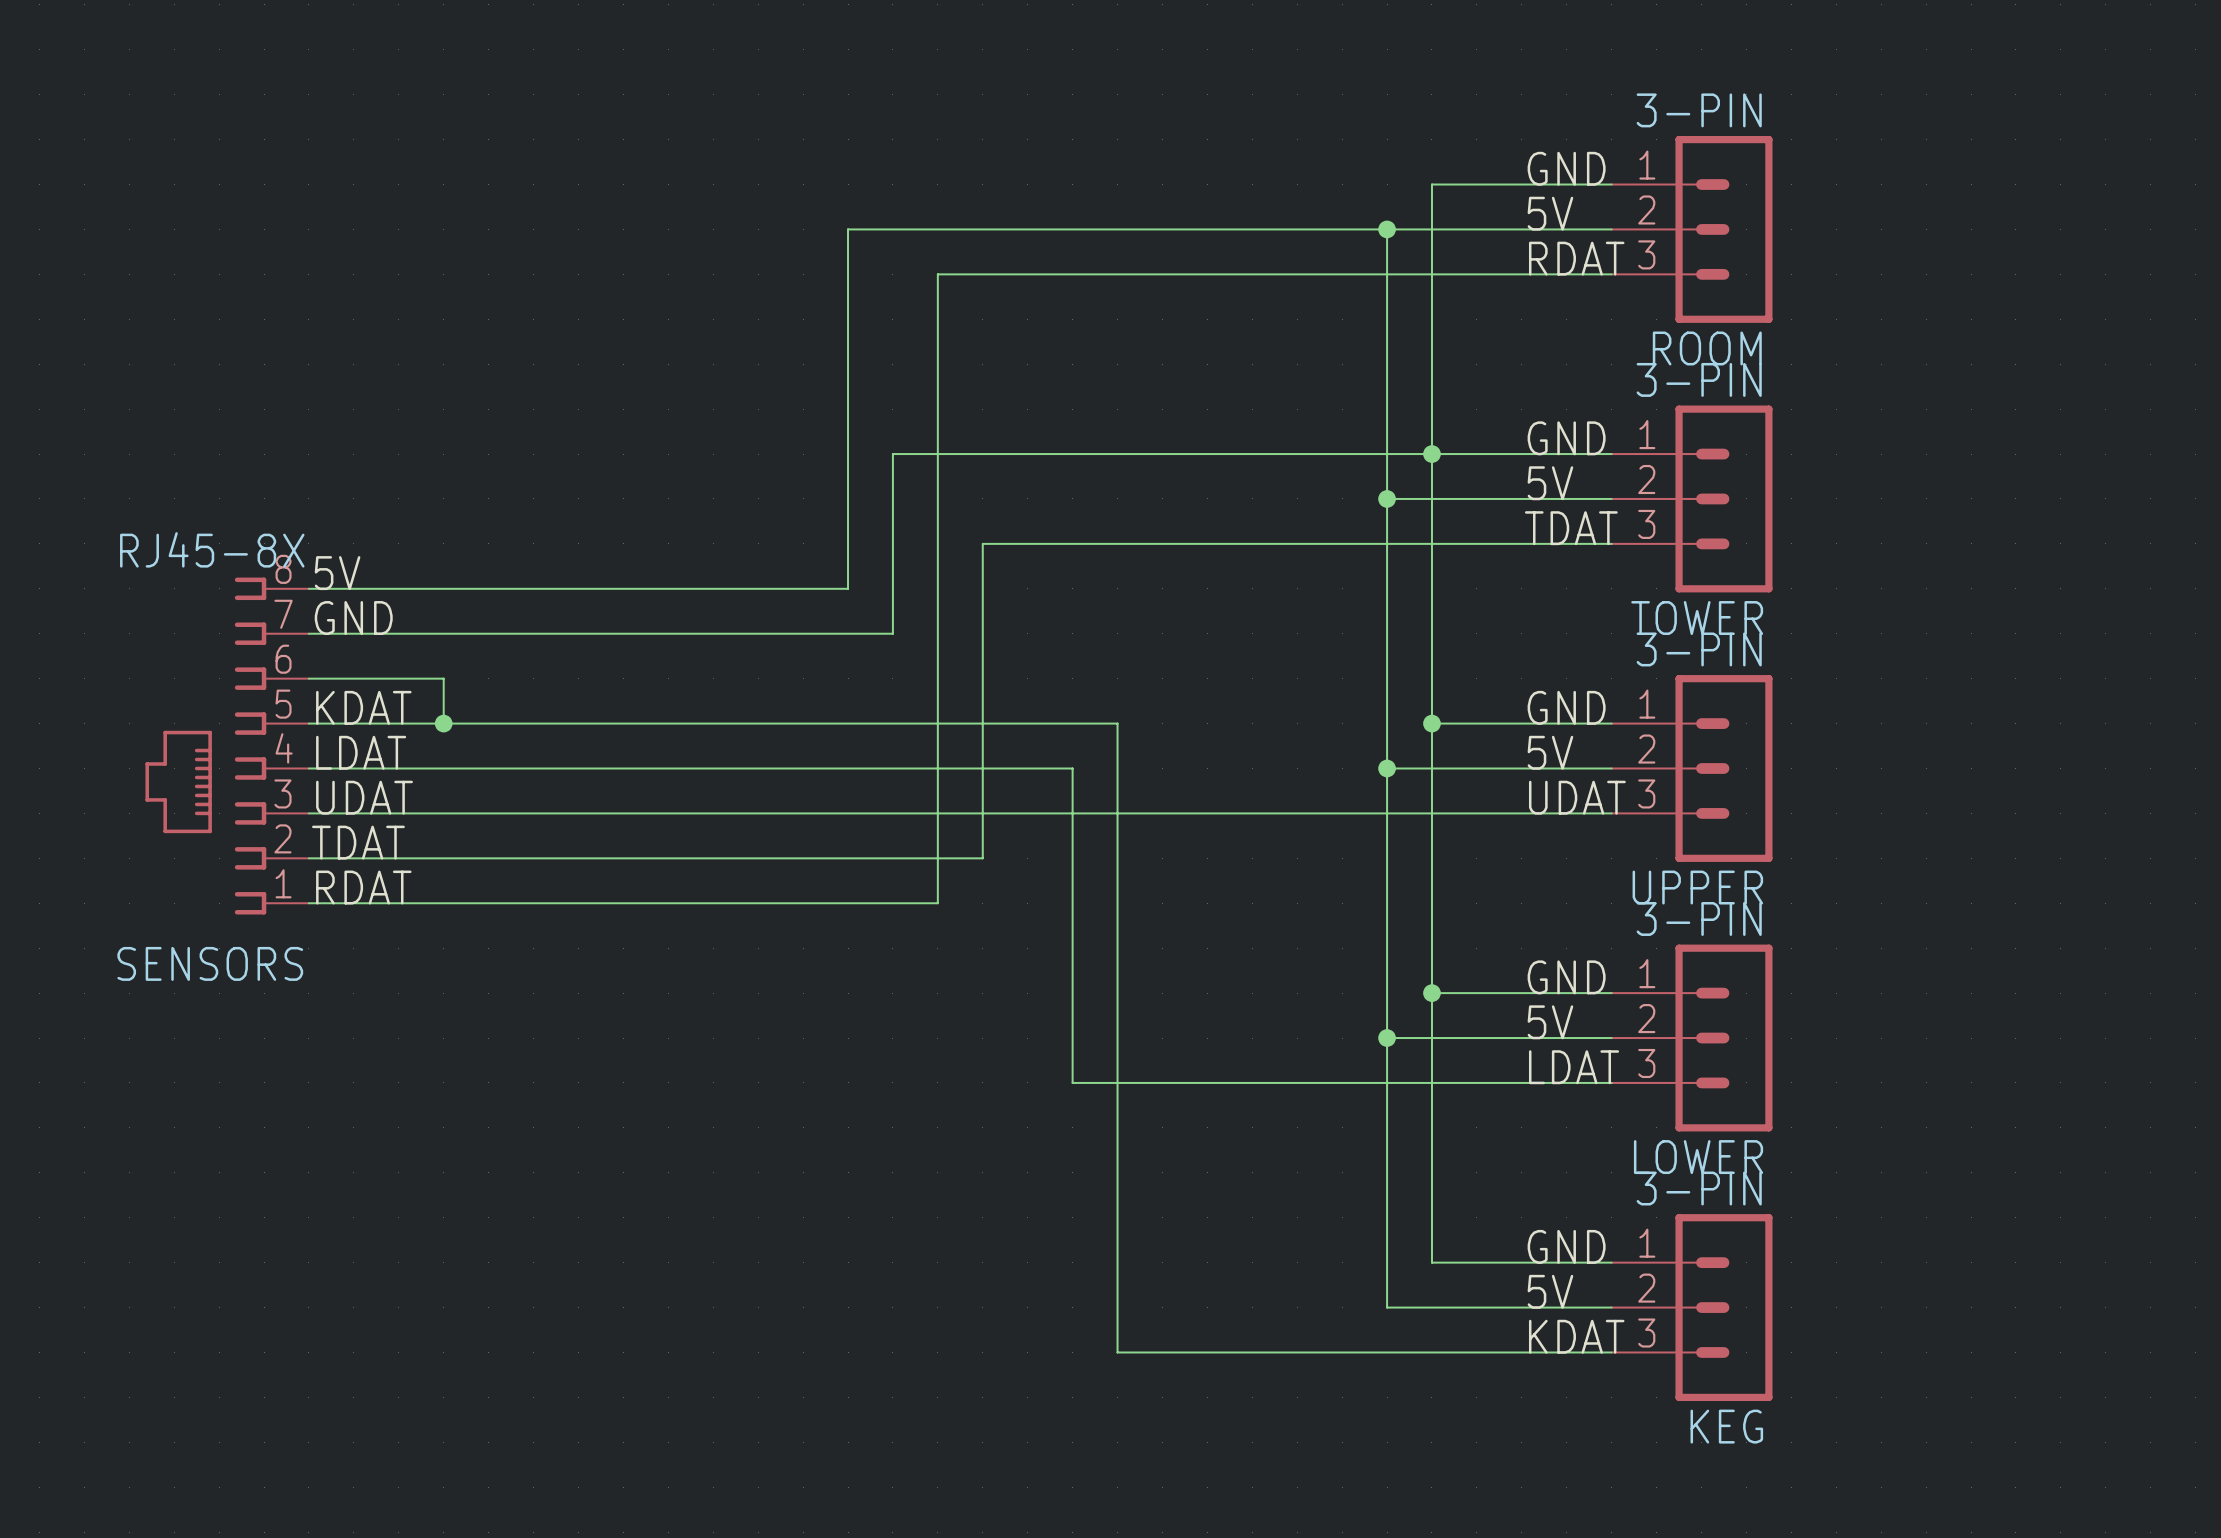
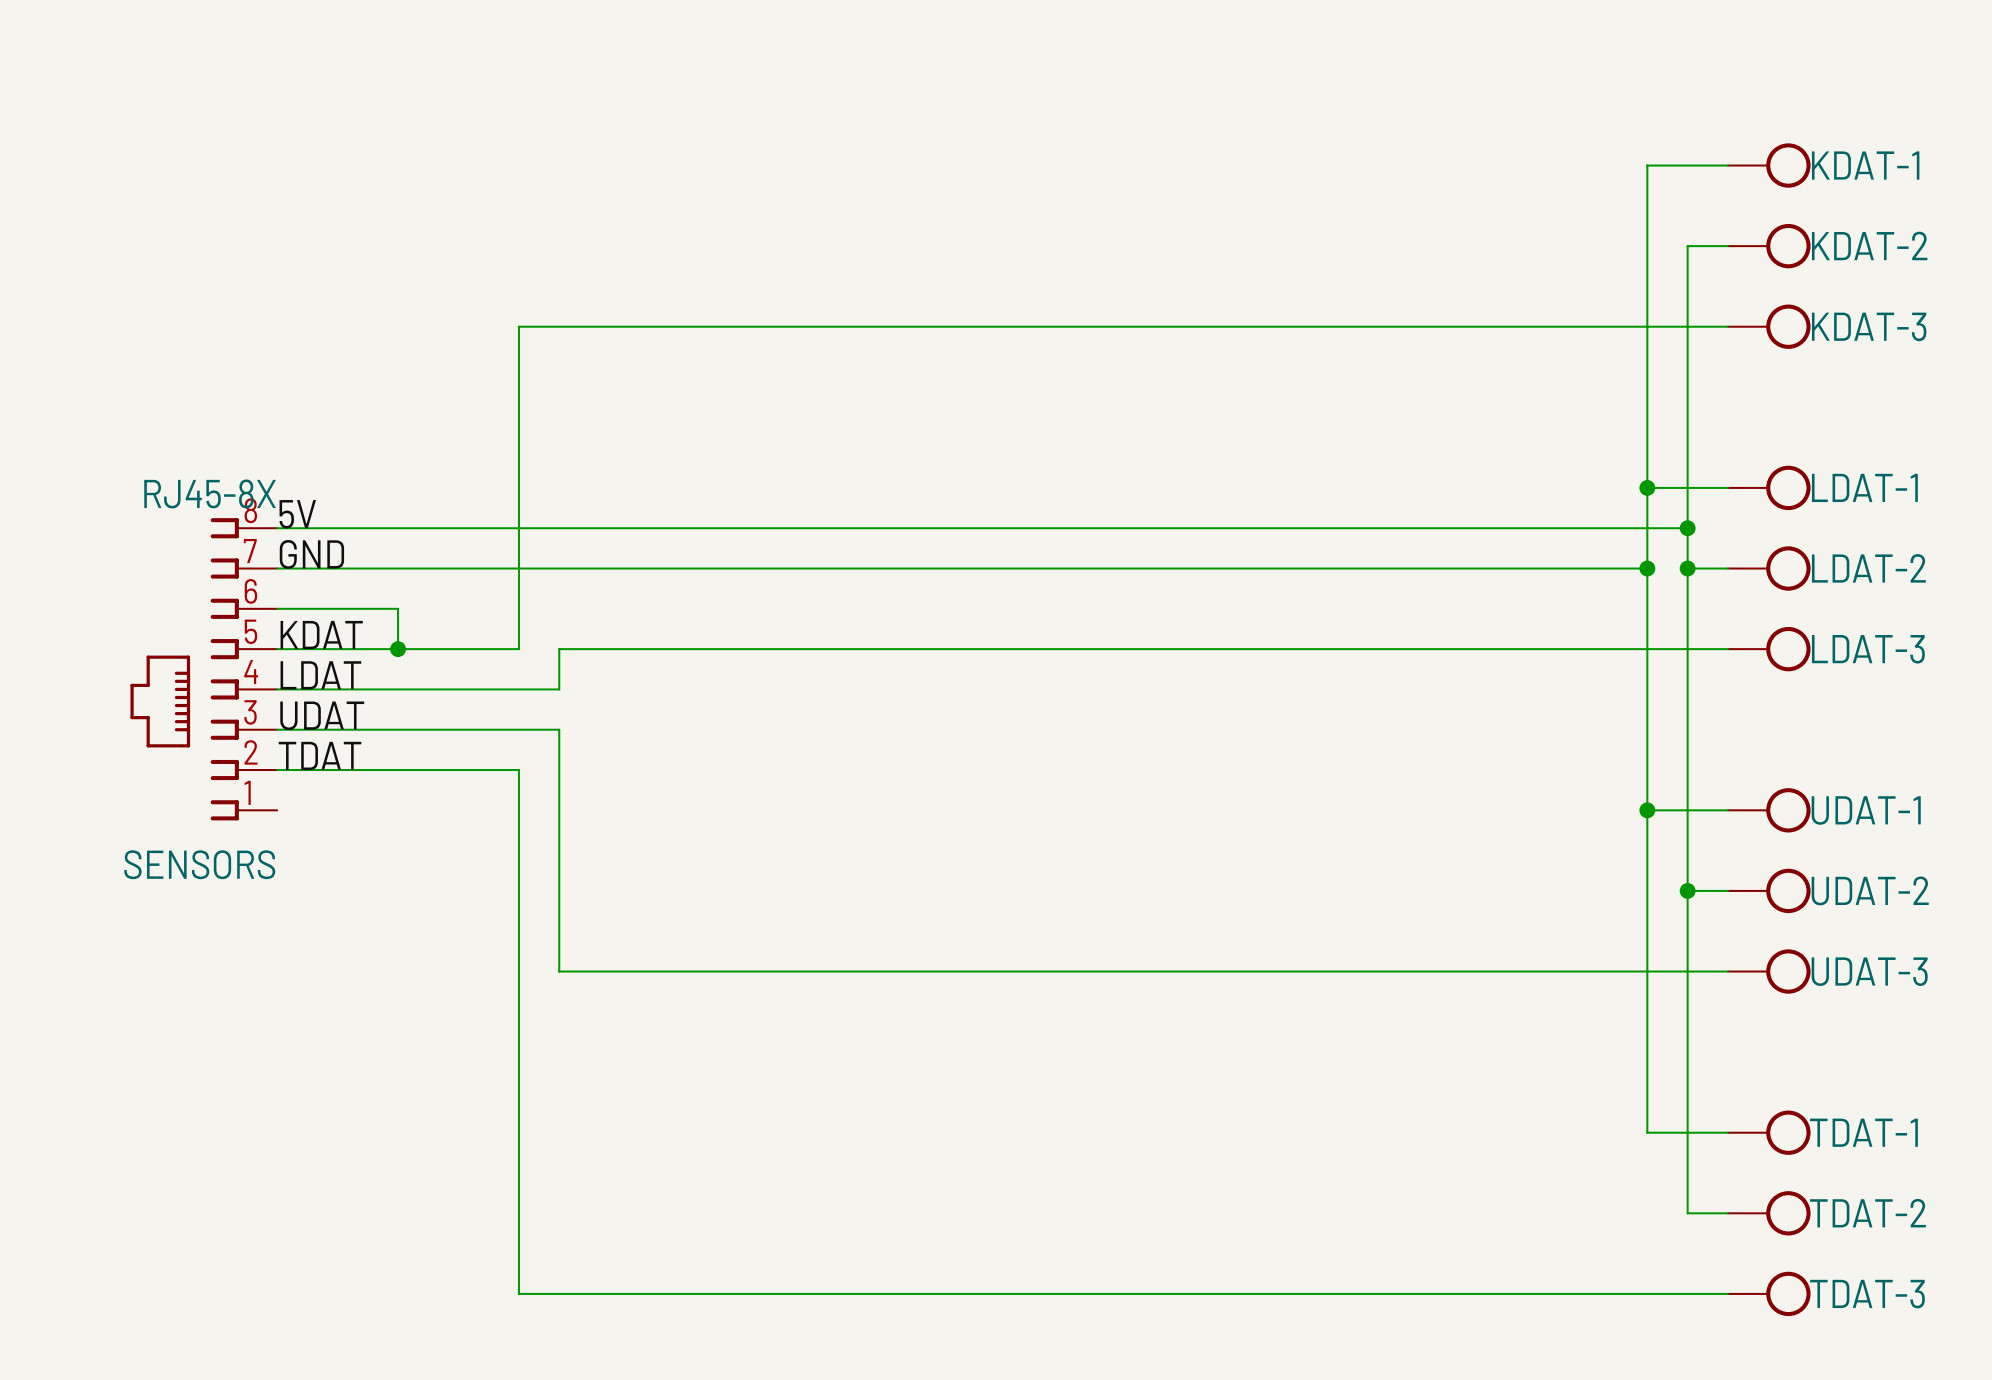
label: GND (1566, 168) -> none
wire: (1611, 184) (1431, 184) (1431, 1262) (1611, 1262) -> none
wire: none -> (1727, 165) (1647, 165) (1647, 1132) (1727, 1132)
KDAT-1: none -> (1769, 165)
label: 5V (1550, 213) -> none
wire: (1387, 229) (1387, 1307) (1611, 1307) -> none
junction: (1387, 229) -> none
wire: (1611, 229) (848, 229) (848, 588) -> (1687, 528) (760, 528)
ROOM: 3-PIN (1692, 229) -> none
label: RDAT (1576, 258) -> none
wire: (1611, 274) (937, 274) (937, 903) (308, 903) -> none
wire: none -> (1727, 246) (1687, 246) (1687, 1213) (1727, 1213)
KDAT-2: none -> (1769, 246)
wire: none -> (1727, 326) (518, 326) (518, 649)
KDAT-3: none -> (1769, 326)
label: GND (1566, 438) -> none
junction: (1431, 454) -> none
wire: (1611, 454) (892, 454) (892, 633) -> (1647, 568) (801, 568)
label: 5V (1550, 483) -> none
wire: (1387, 498) (1611, 498) -> none
junction: (1387, 498) -> none
TOWER: 3-PIN (1692, 498) -> none
label: TDAT (1571, 528) -> none
wire: (1611, 543) (982, 543) (982, 858) (578, 858) -> (1727, 1293) (518, 1293) (518, 770)
wire: none -> (1647, 487) (1727, 487)
junction: none -> (1647, 487)
LDAT-1: none -> (1769, 487)
junction: none -> (1687, 528)
junction: none -> (1647, 568)
wire: none -> (1687, 568) (1727, 568)
junction: none -> (1687, 568)
LDAT-2: none -> (1769, 568)
label: GND (1566, 707) -> none
wire: (578, 723) (623, 723) -> (559, 689) (559, 649)
wire: (1117, 723) (1117, 1352) (1611, 1352) -> (1002, 649) (1284, 649)
junction: (1431, 723) -> none
wire: none -> (1445, 649) (1727, 649)
LDAT-3: none -> (1769, 649)
label: 5V (1550, 752) -> none
wire: (623, 768) (1072, 768) (1072, 1082) -> (559, 729) (559, 971) (962, 971)
wire: (1387, 768) (1611, 768) -> none
junction: (1387, 768) -> none
UPPER: 3-PIN (1692, 768) -> none
label: UDAT (1577, 797) -> none
wire: (623, 813) (1611, 813) -> none
label: RDAT (363, 887) -> none
wire: none -> (1647, 810) (1727, 810)
junction: none -> (1647, 810)
UDAT-1: none -> (1769, 810)
label: GND (1566, 977) -> none
wire: (1431, 993) (1611, 993) -> none
junction: (1431, 993) -> none
wire: none -> (1687, 890) (1727, 890)
junction: none -> (1687, 890)
UDAT-2: none -> (1769, 890)
label: 5V (1550, 1022) -> none
wire: (1387, 1038) (1611, 1038) -> none
junction: (1387, 1038) -> none
LOWER: 3-PIN (1692, 1038) -> none
label: LDAT (1574, 1067) -> none
wire: none -> (1445, 971) (1727, 971)
UDAT-3: none -> (1769, 971)
label: GND (1566, 1246) -> none
TDAT-1: none -> (1769, 1132)
label: 5V (1550, 1291) -> none
KEG: 3-PIN (1692, 1307) -> none
label: KDAT (1576, 1336) -> none
TDAT-2: none -> (1769, 1213)
TDAT-3: none -> (1769, 1293)

